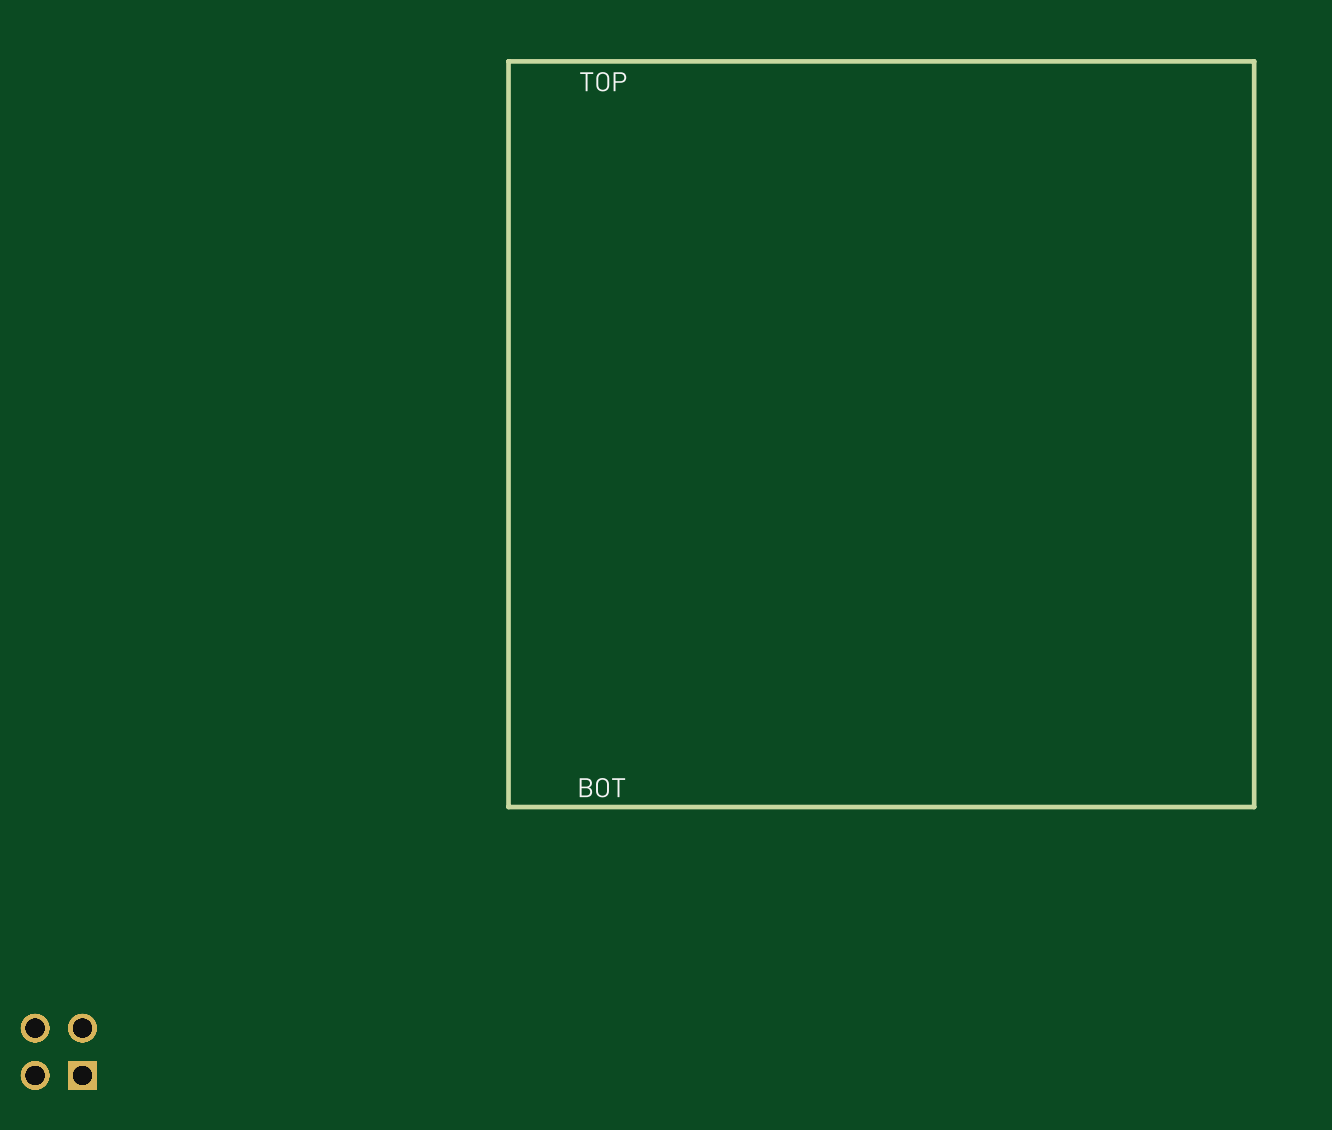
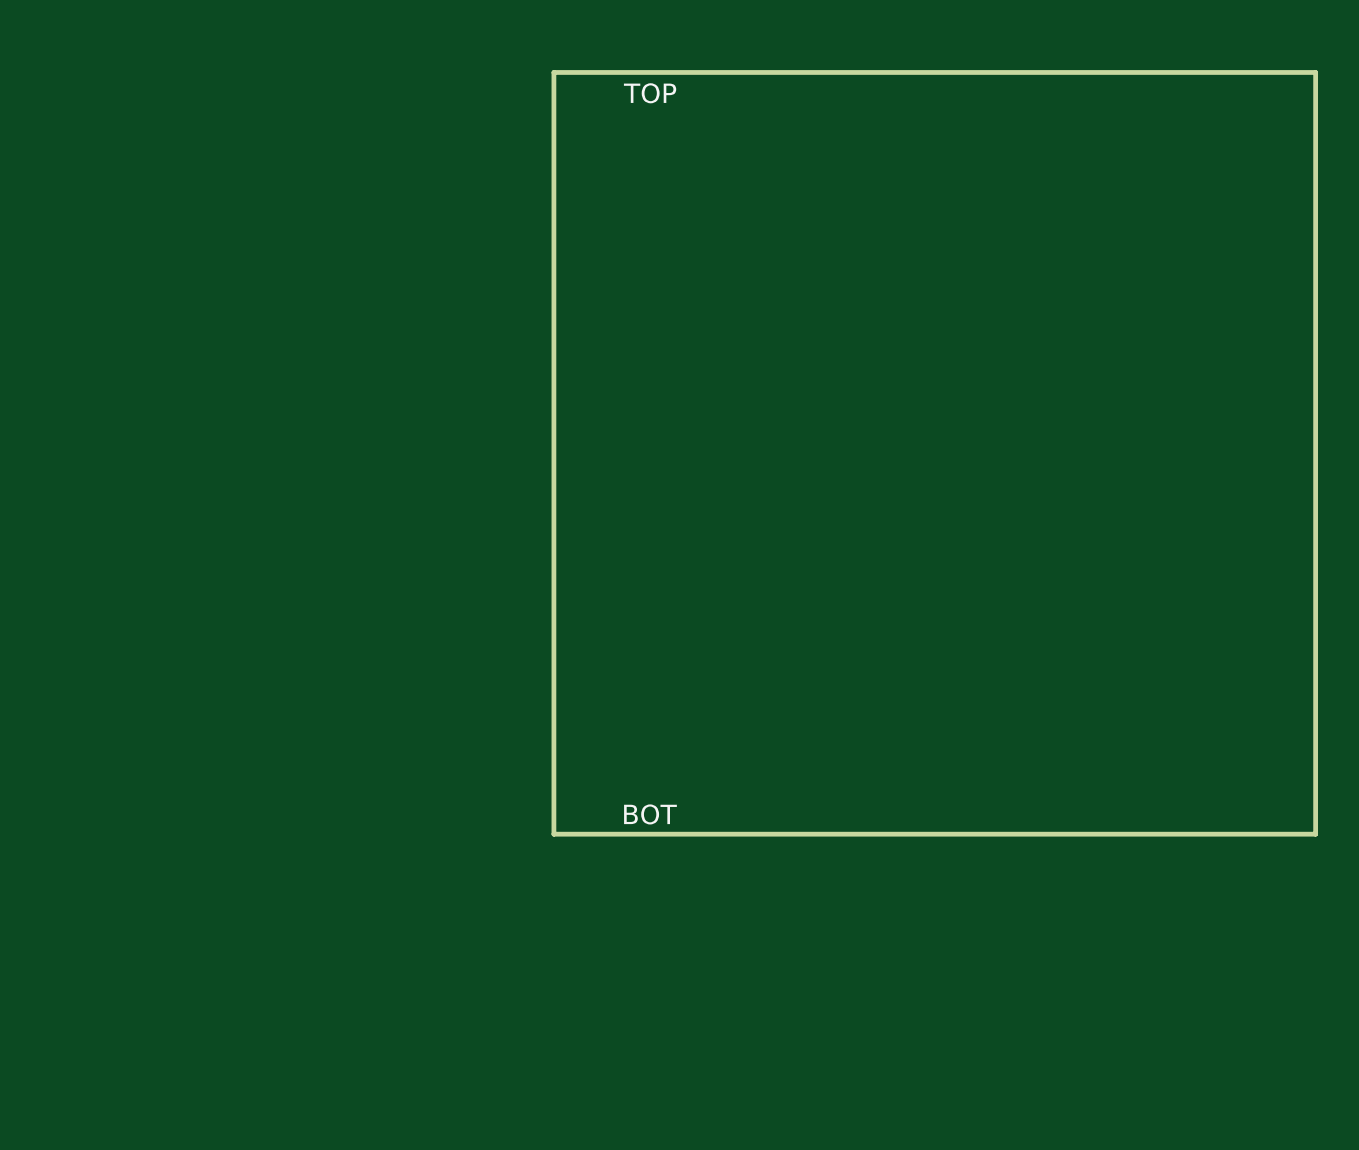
part: (58, 1051) -> none

